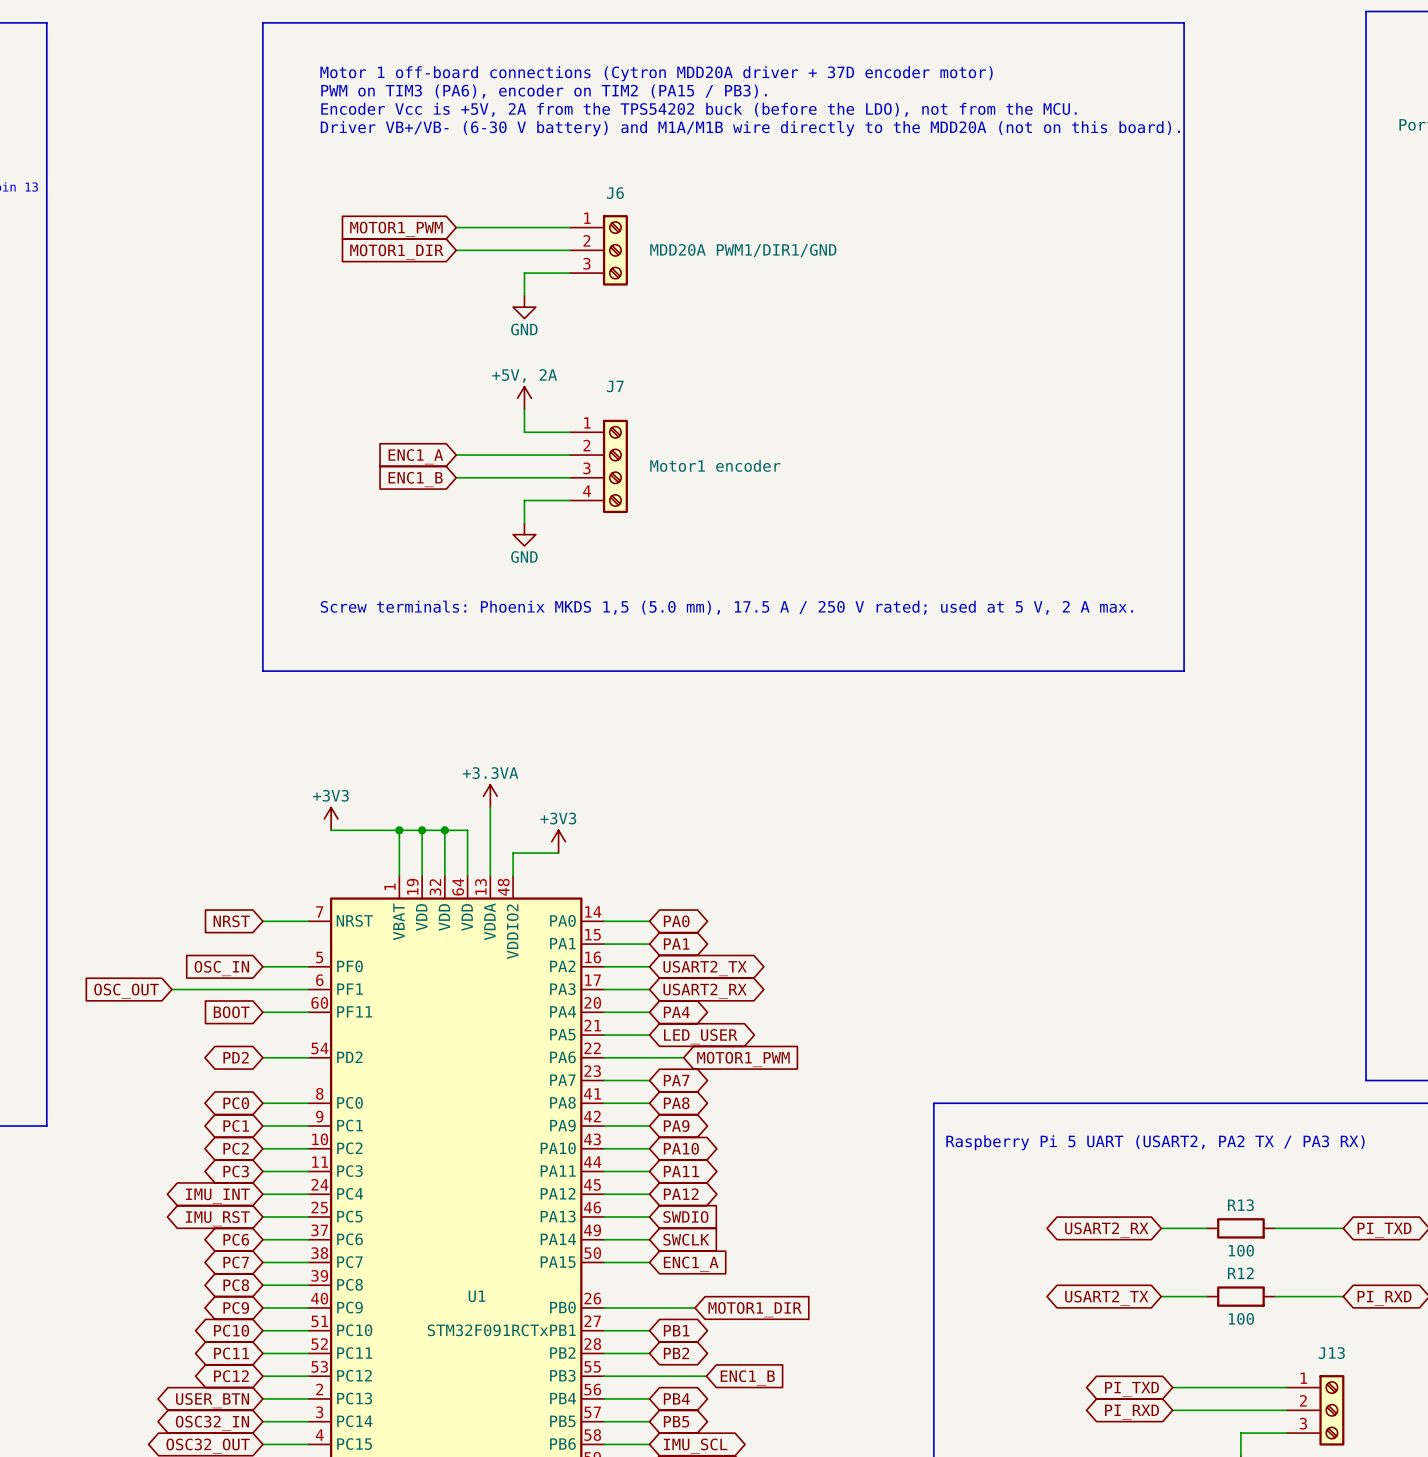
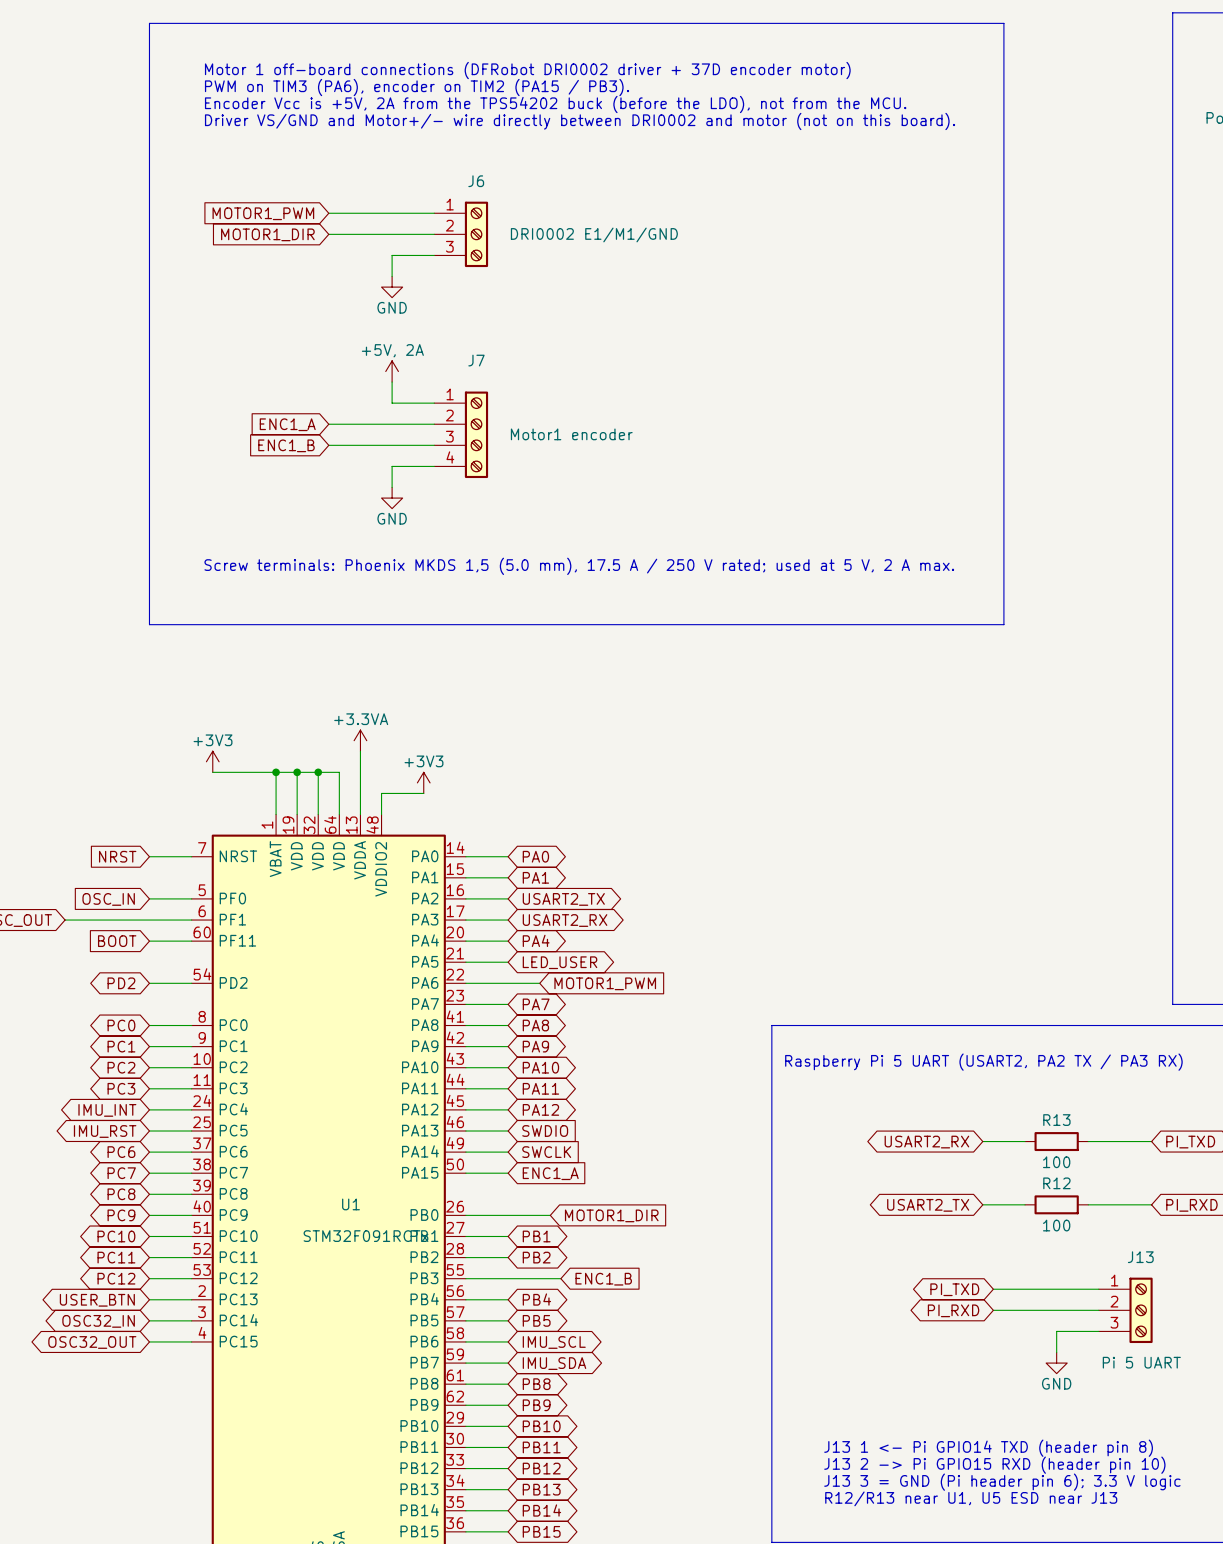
text: Motor 1 off-board connections (Cytron MDD20A driver + 37D encoder motor) (656, 73) -> Motor 1 off-board connections (DFRobot DRI0002 driver + 37D encoder motor) (527, 70)
text: Driver VB+/VB- (6-30 V battery) and M1A/M1B wire directly to the MDD20A (not on this board). (750, 128) -> Driver VS/GND and Motor+/- wire directly between DRI0002 and motor (not on this board). (580, 121)
J6 value: MDD20A PWM1/DIR1/GND (743, 250) -> DRI0002 E1/M1/GND (594, 234)

